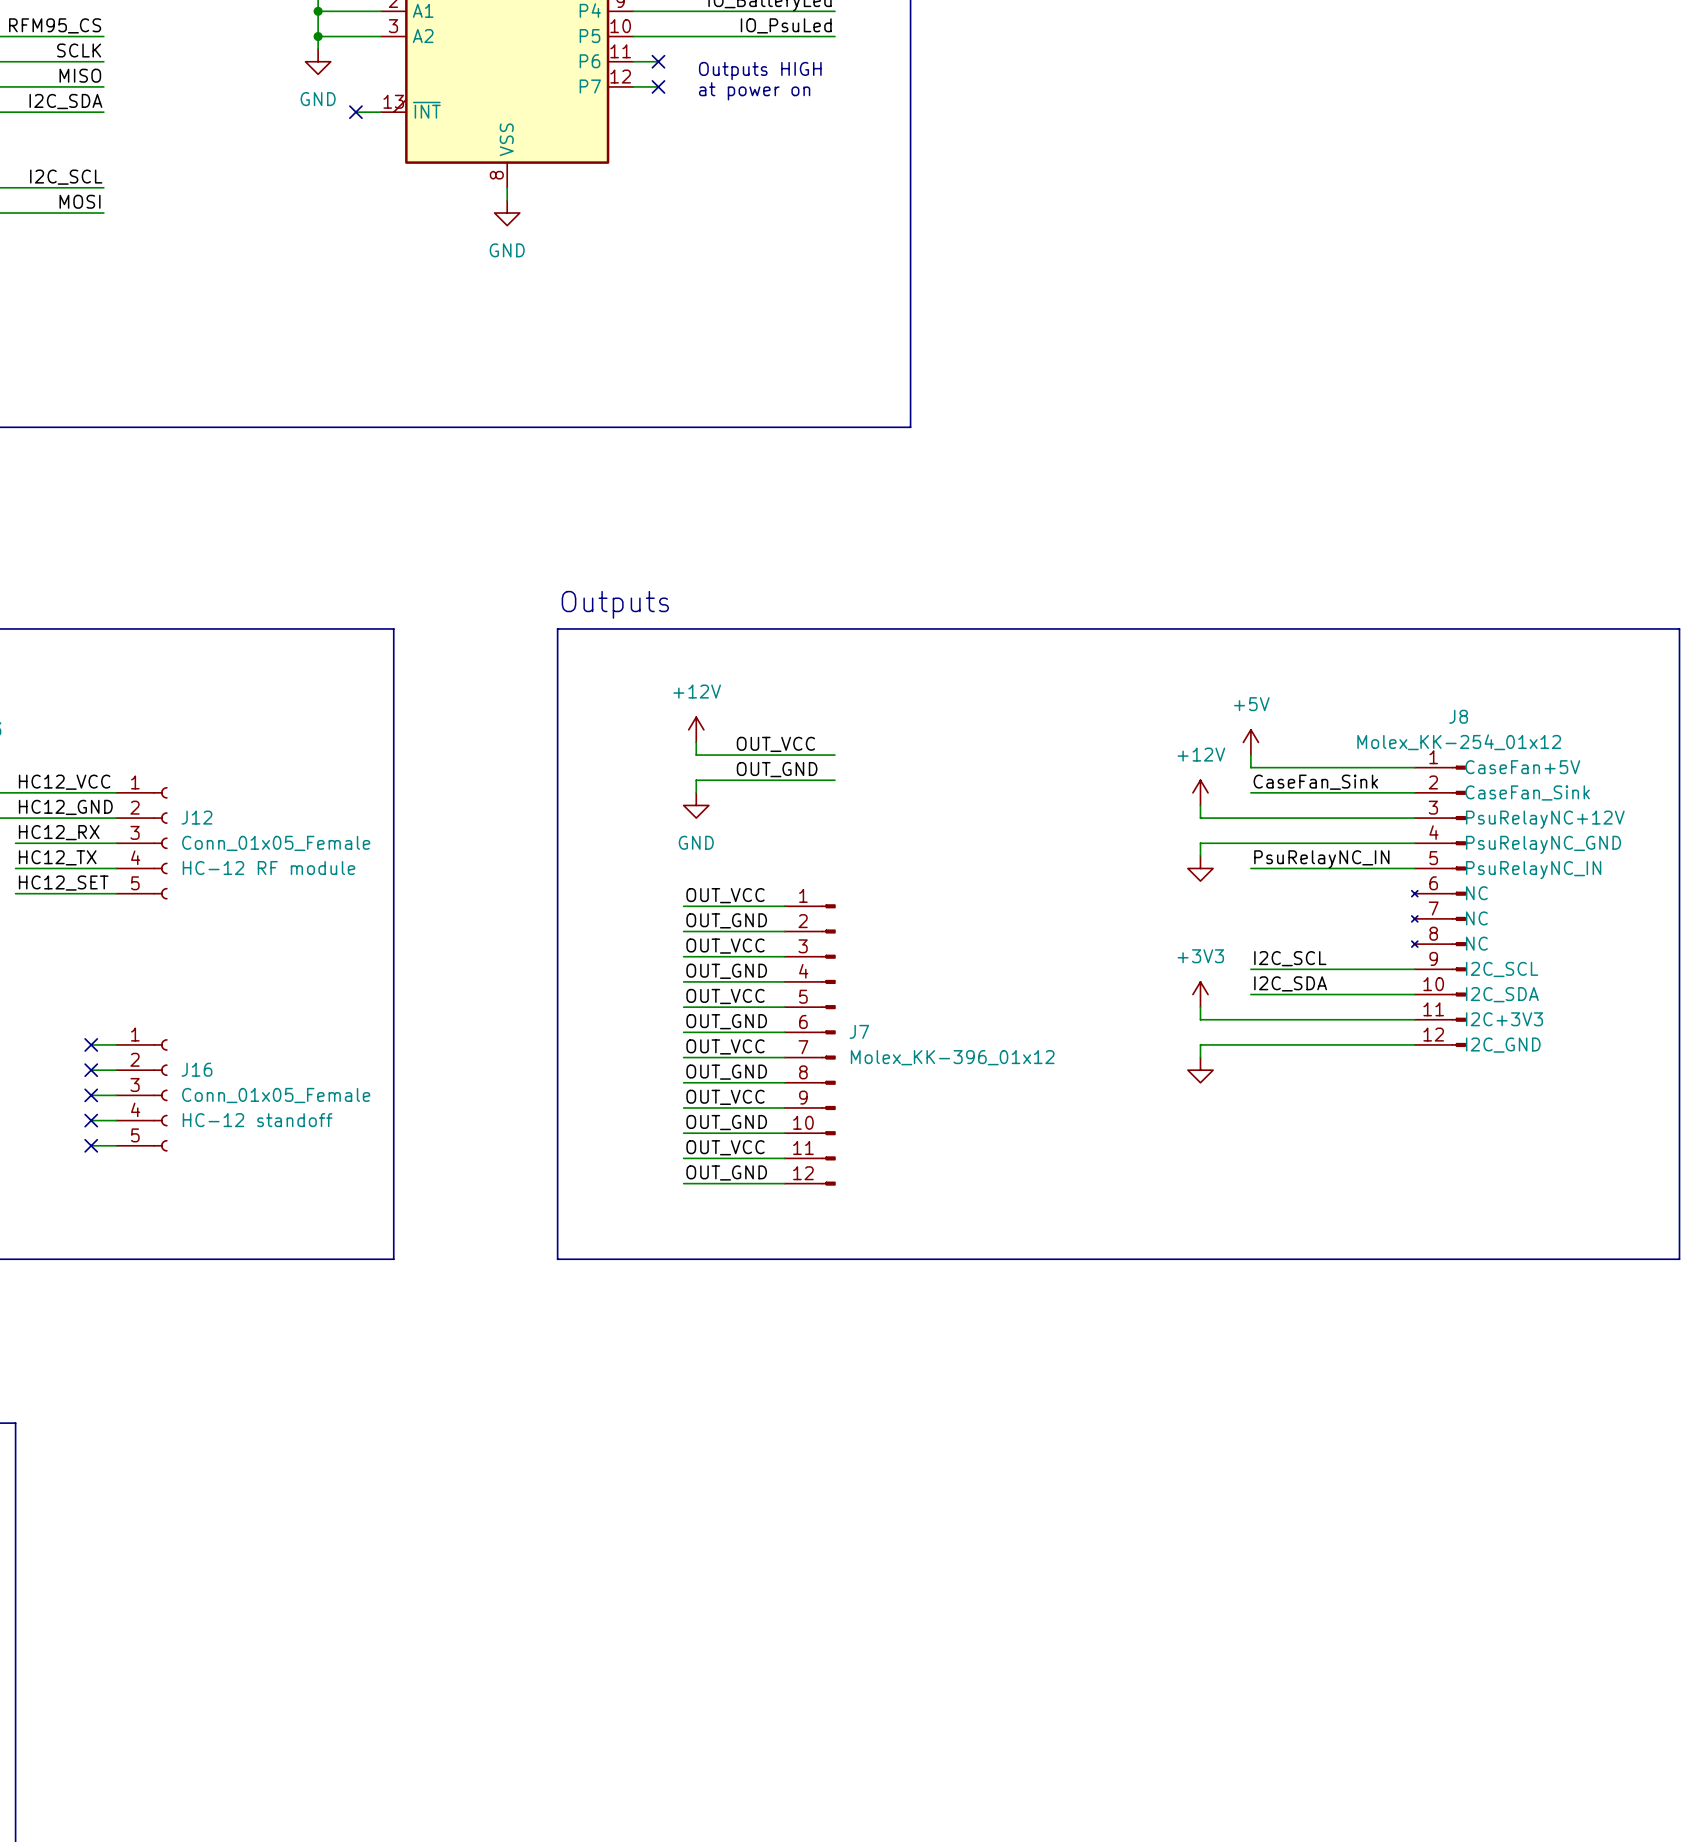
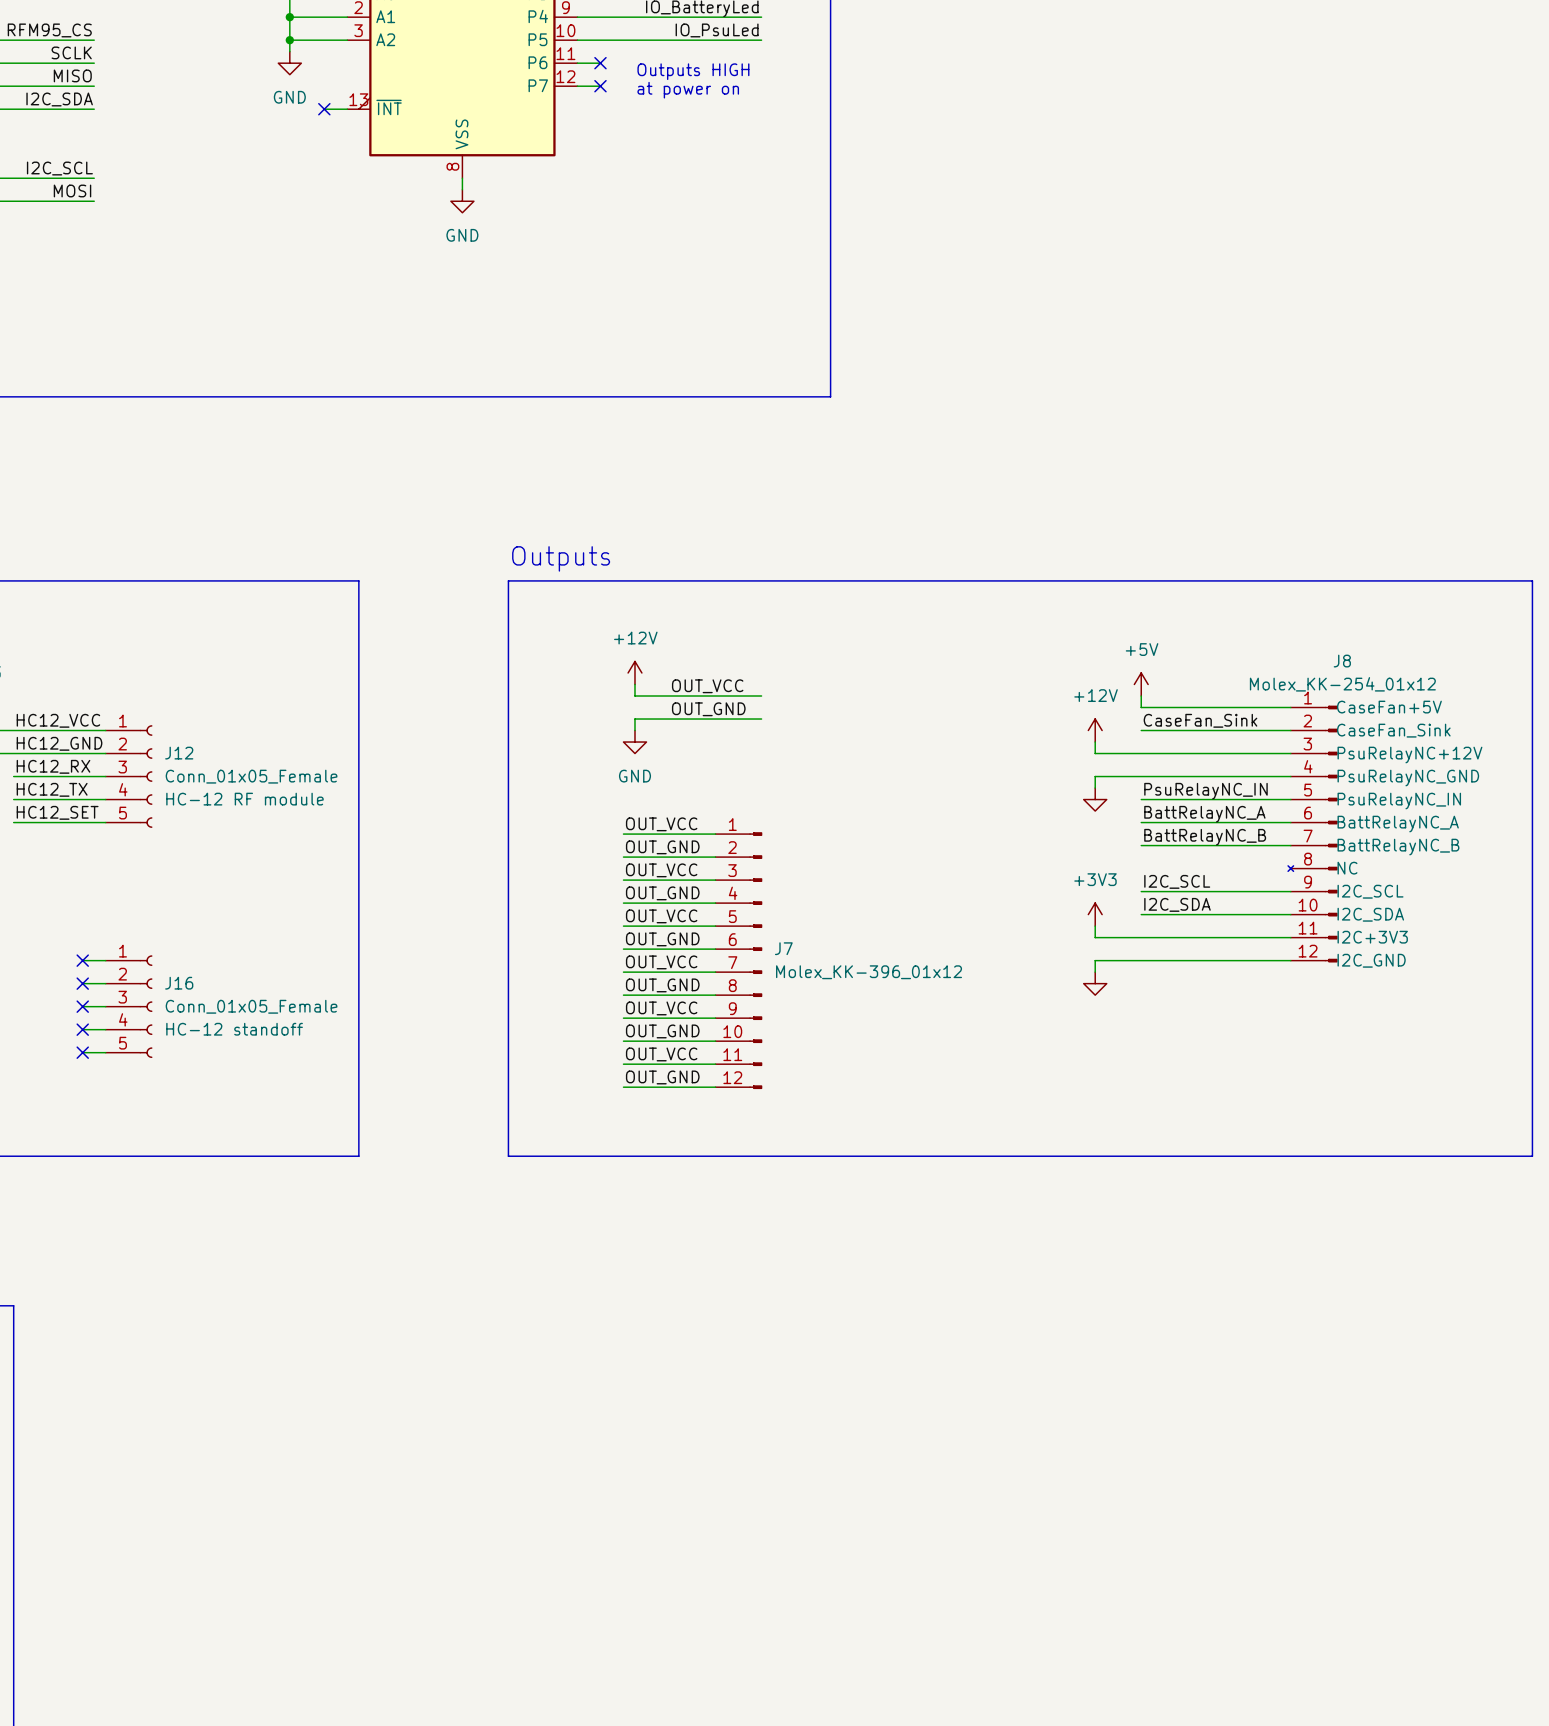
J8 symbol: [1411, 765, 1466, 1047] -> [1288, 705, 1338, 963]
label: none -> BattRelayNC_A (1204, 814)
wire: none -> (1141, 822) (1290, 822)
label: none -> BattRelayNC_B (1205, 837)
wire: none -> (1141, 845) (1290, 845)

